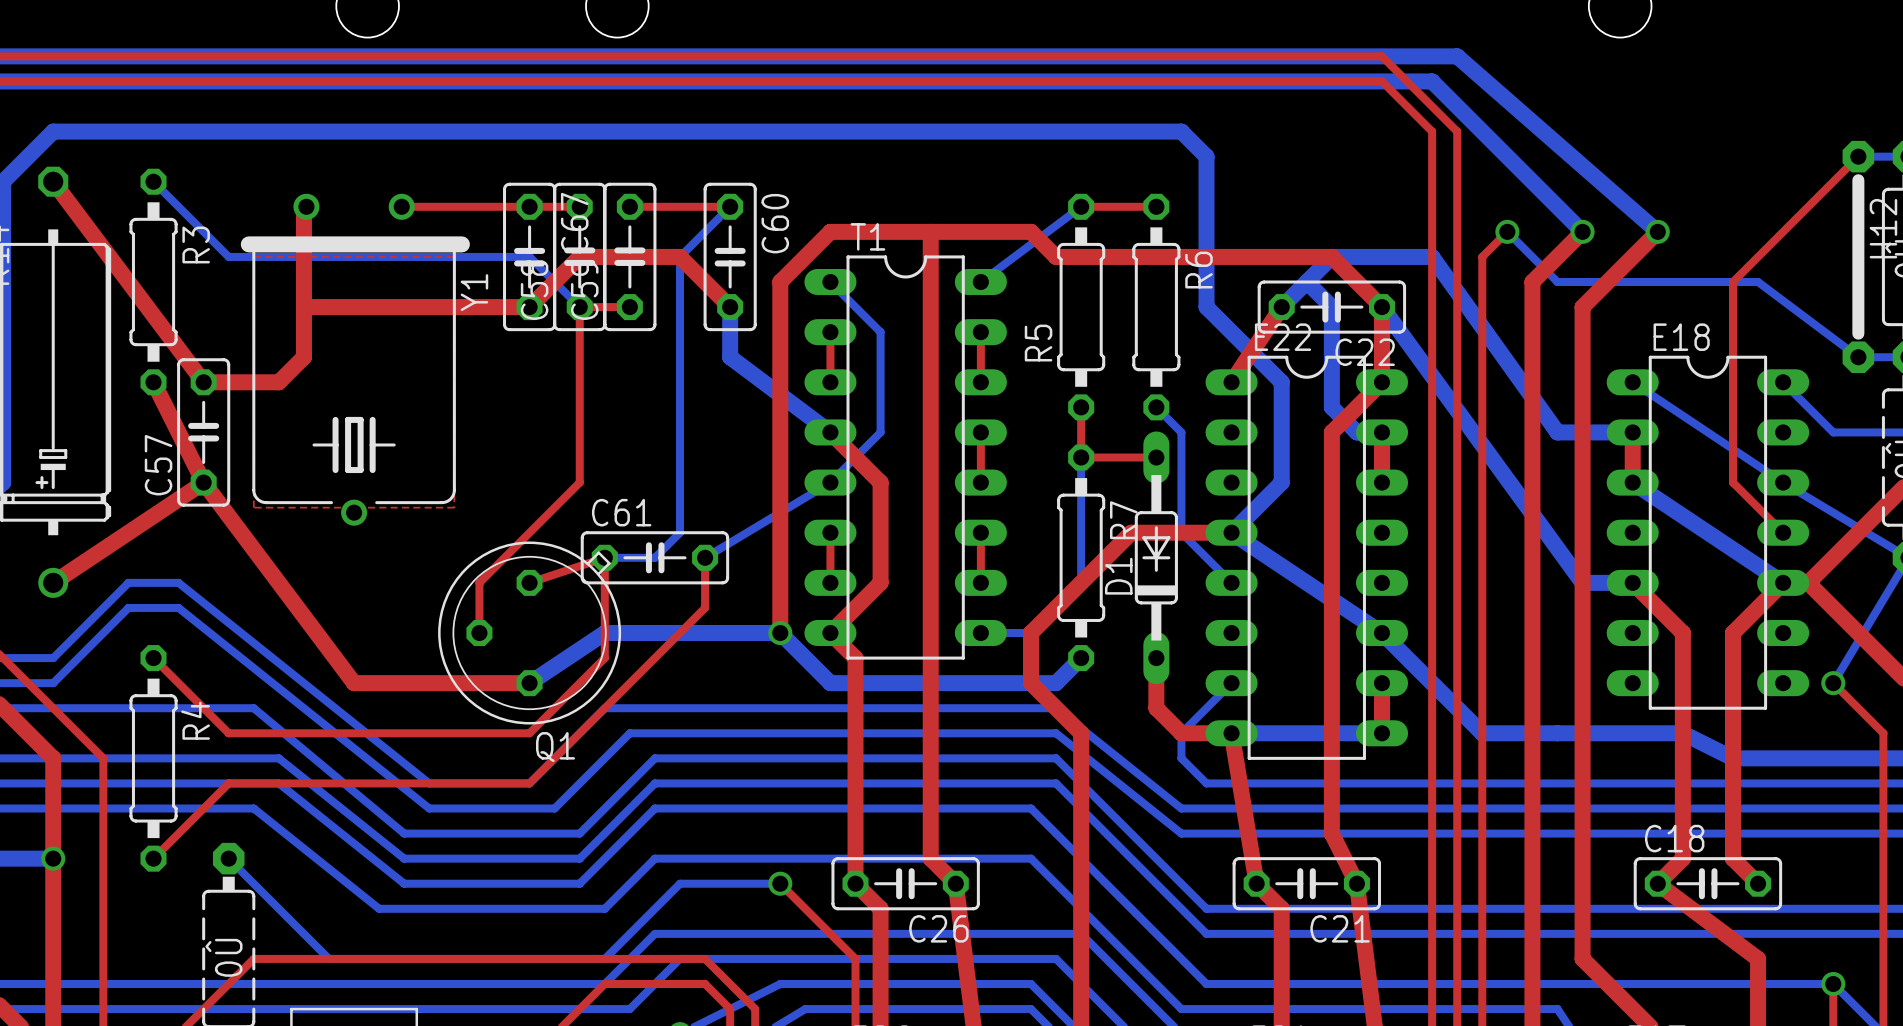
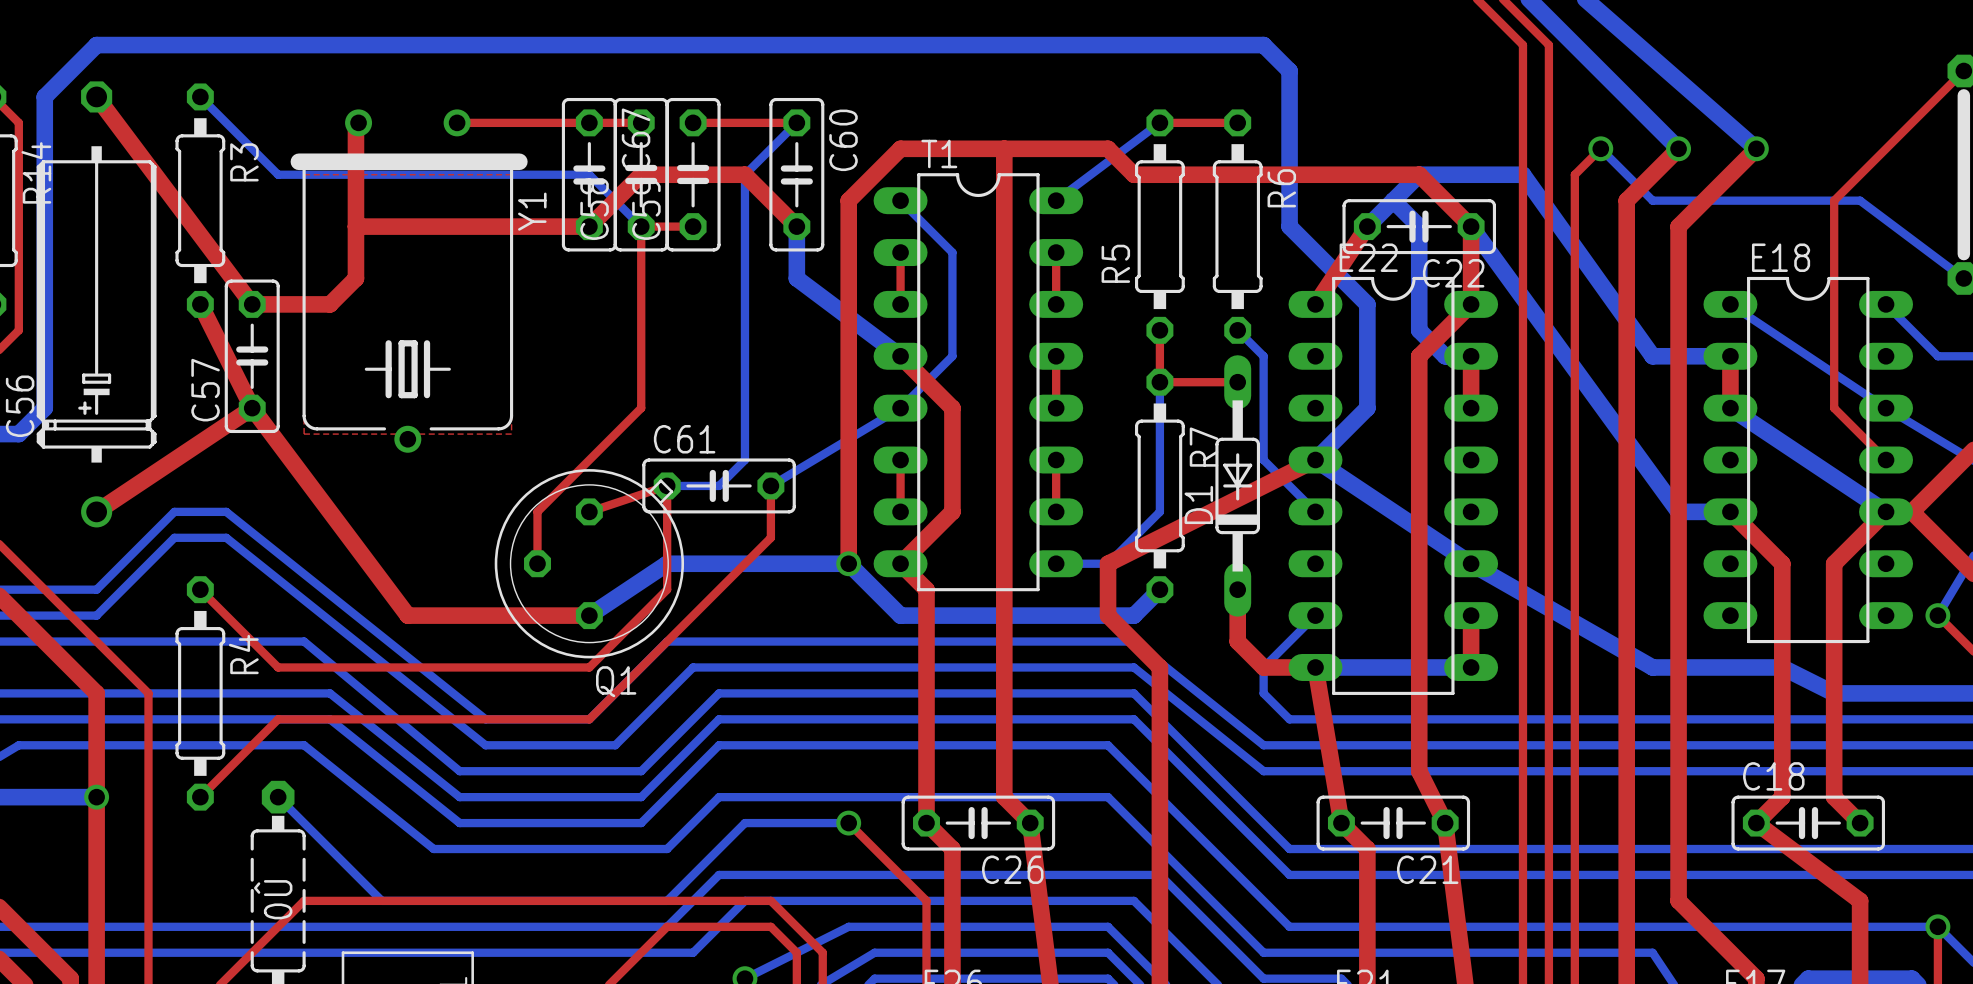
top track: (1231, 532) (1131, 532) (1031, 633) -> (1315, 460) (1108, 563)
bottom track: (1382, 633) (1482, 733) (1557, 733) -> (1471, 563) (1652, 667)

